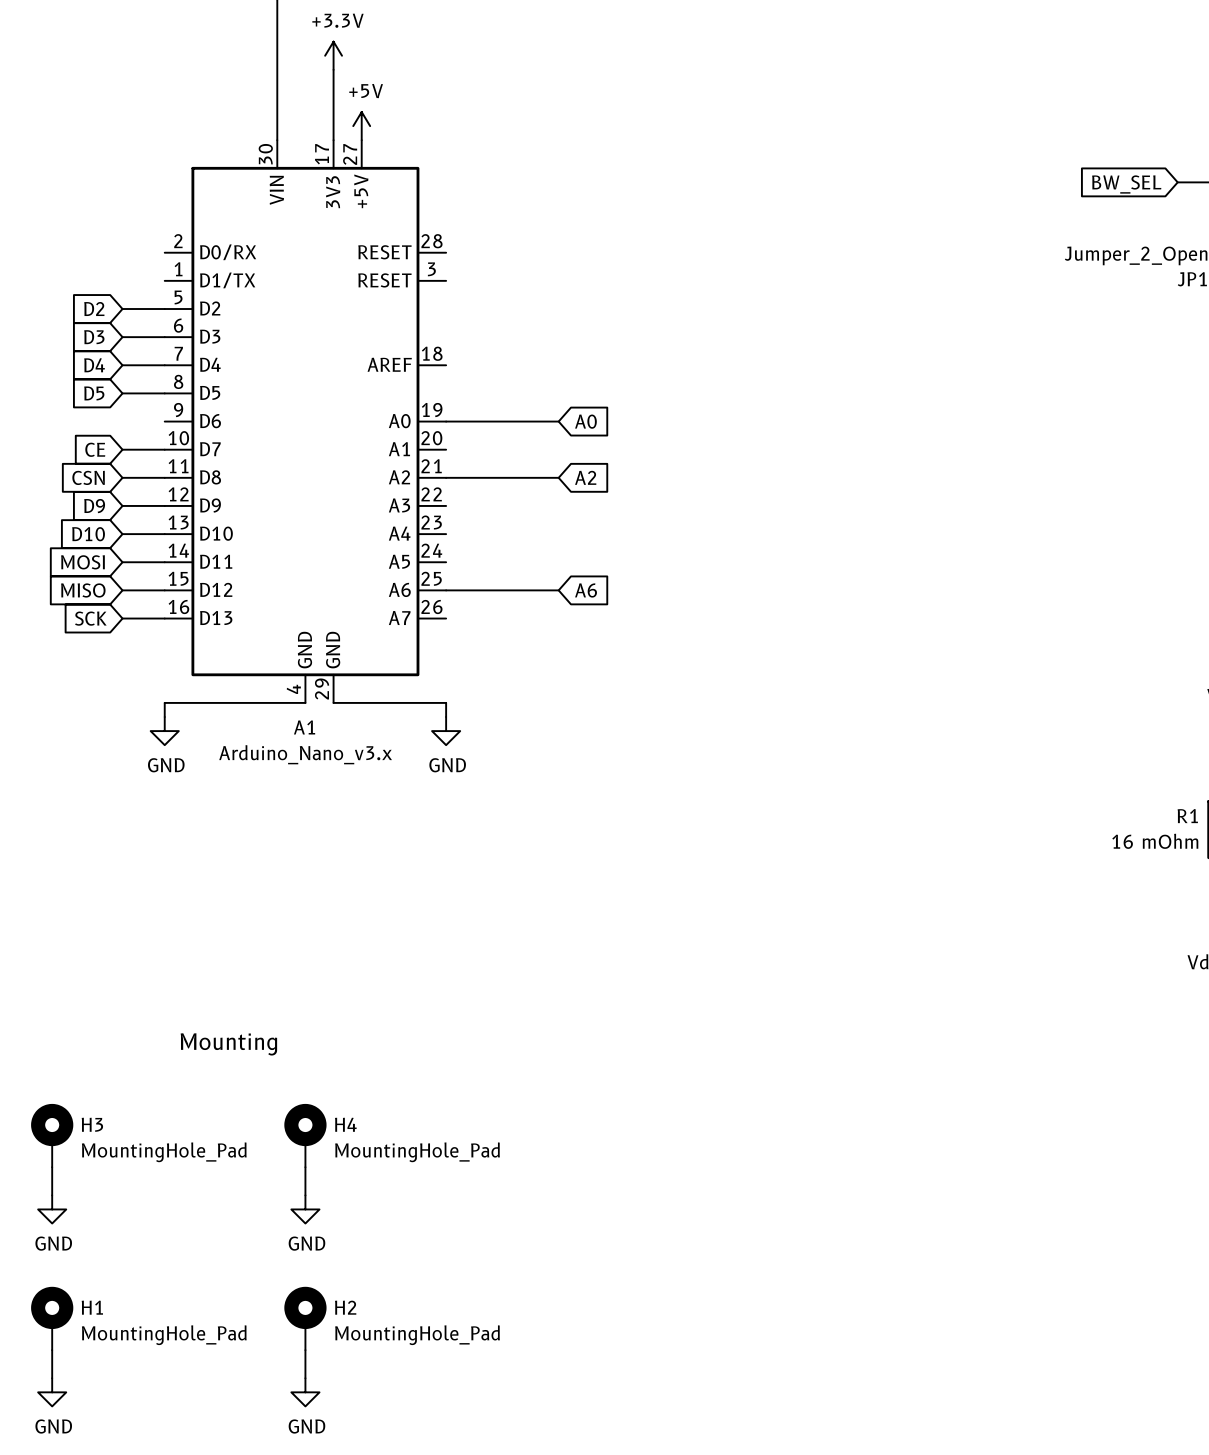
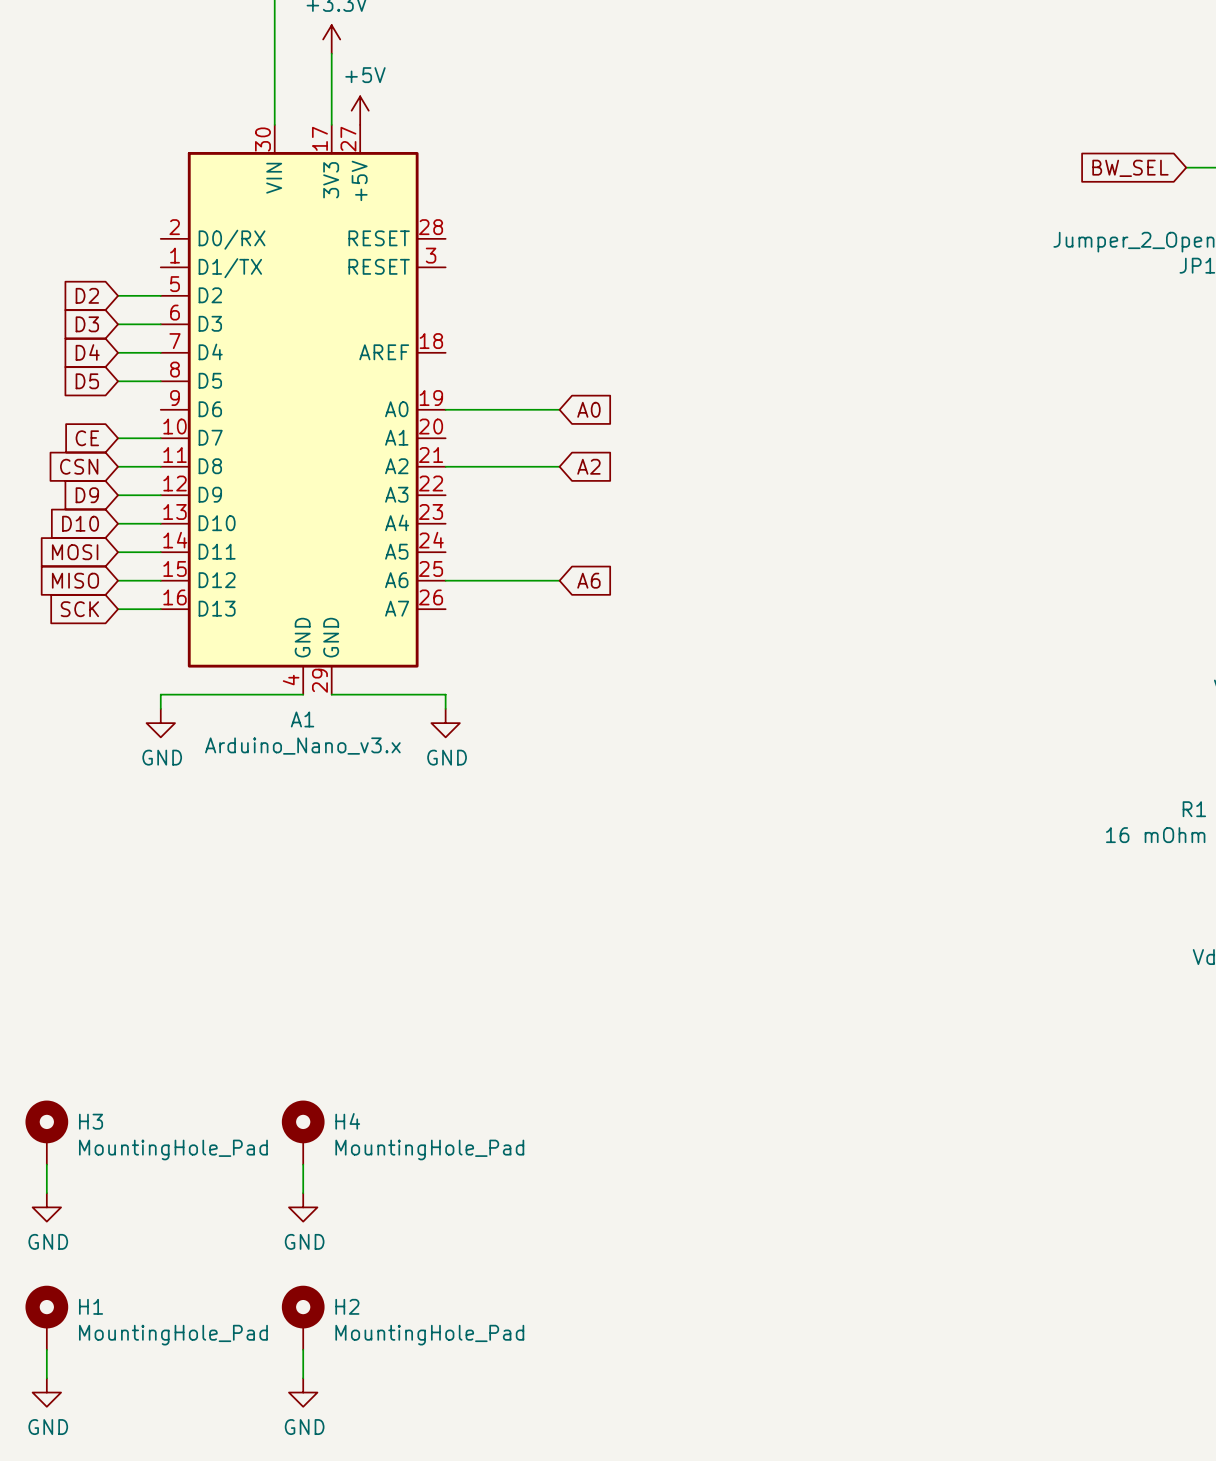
text: Mounting (228, 1044) -> none

